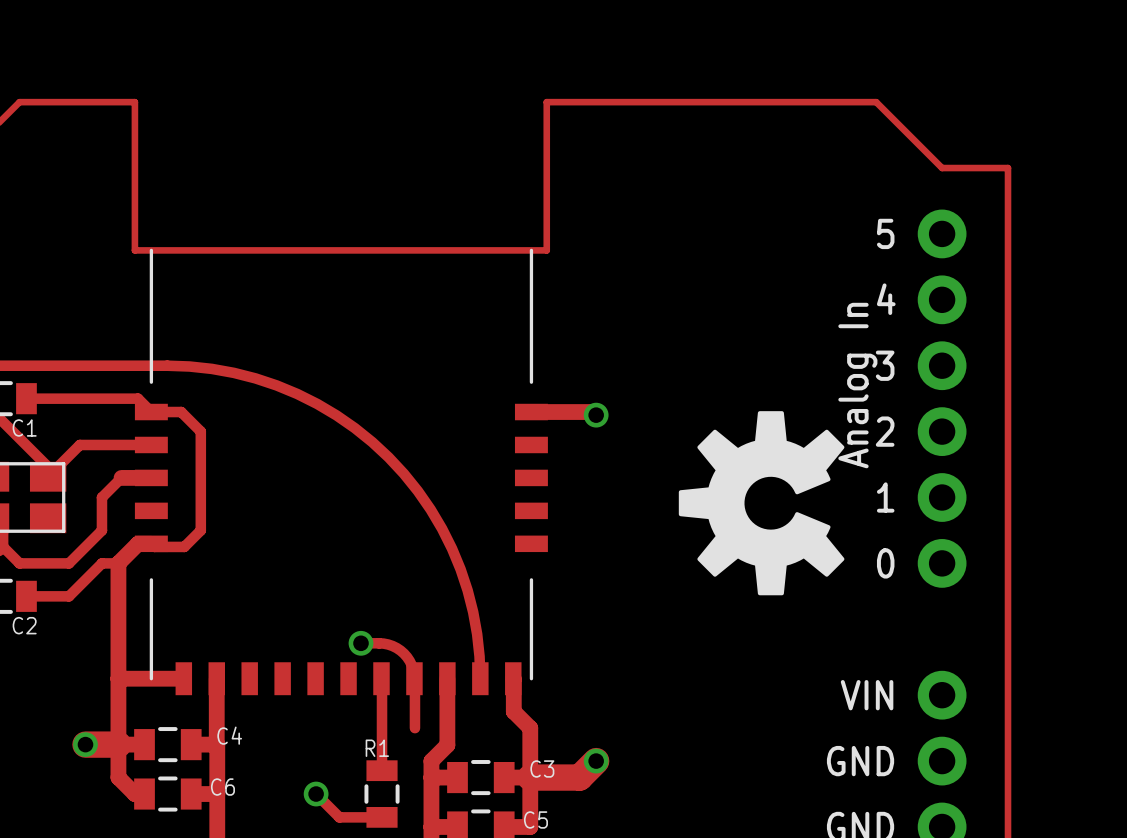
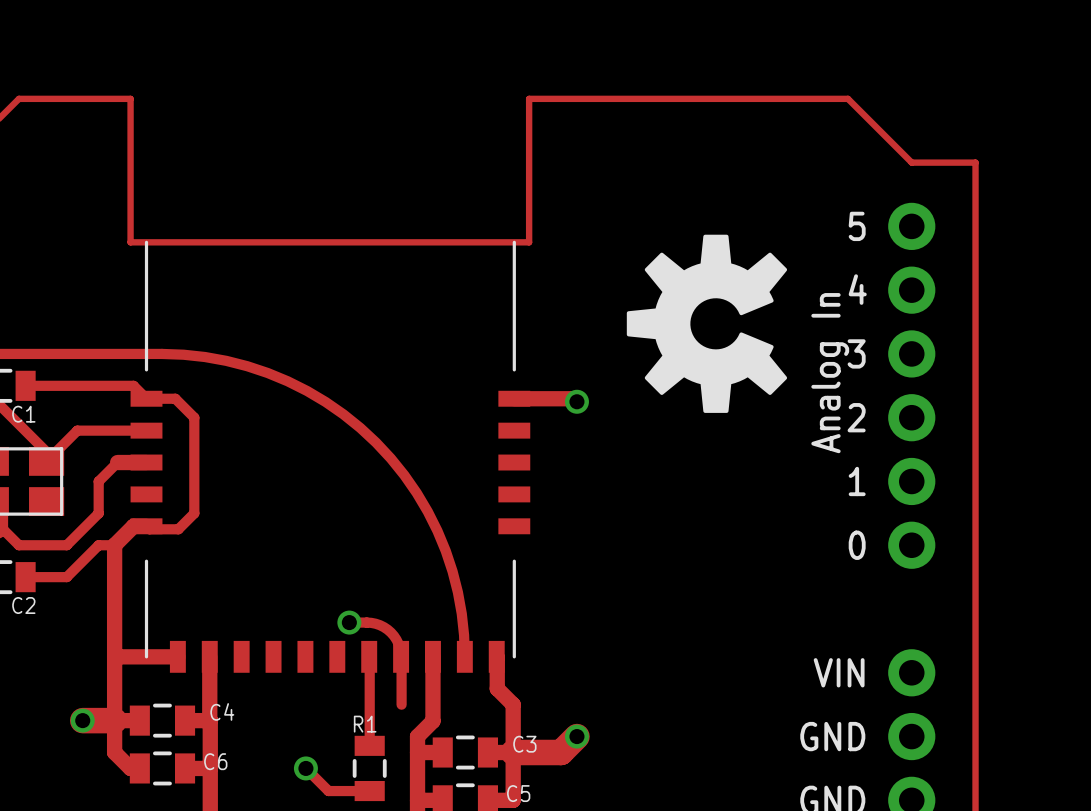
drawing position: (761, 503) -> (706, 323)

